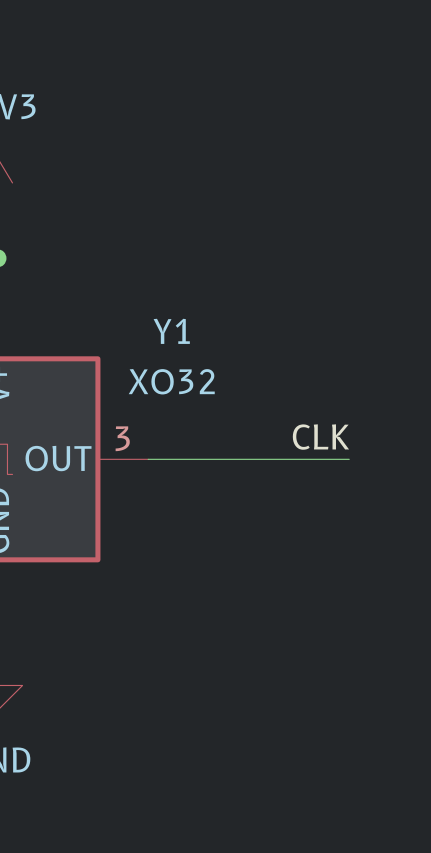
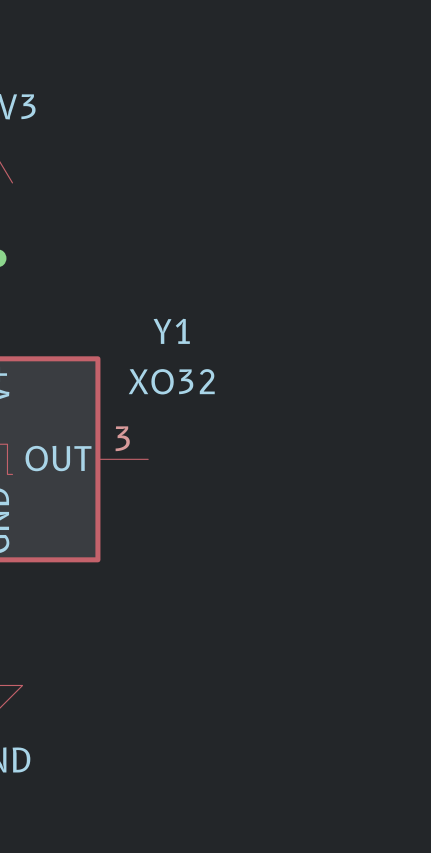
label: CLK (320, 437) -> none
wire: (148, 459) (349, 459) -> none

